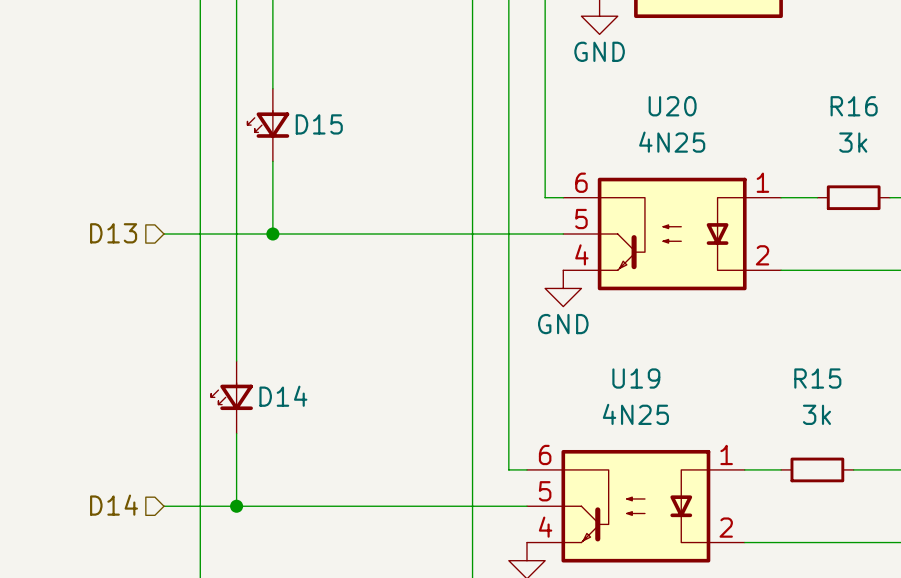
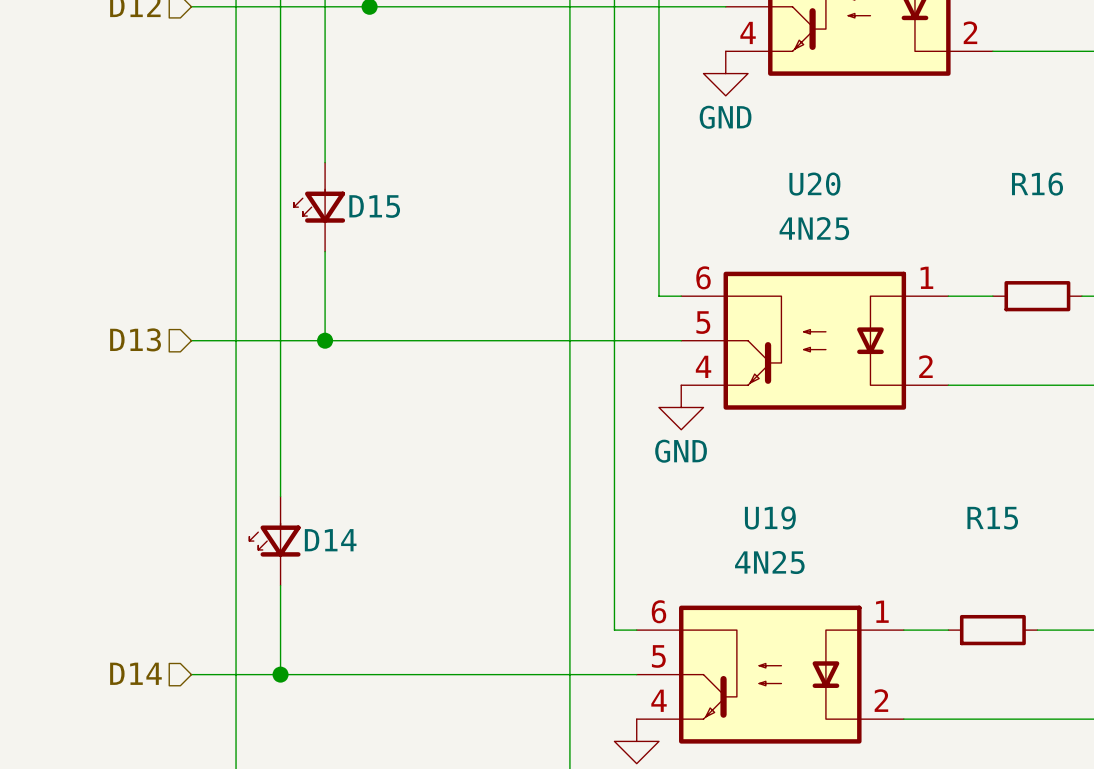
R16 value: 3k (853, 142) -> none
R15 value: 3k (816, 414) -> none

